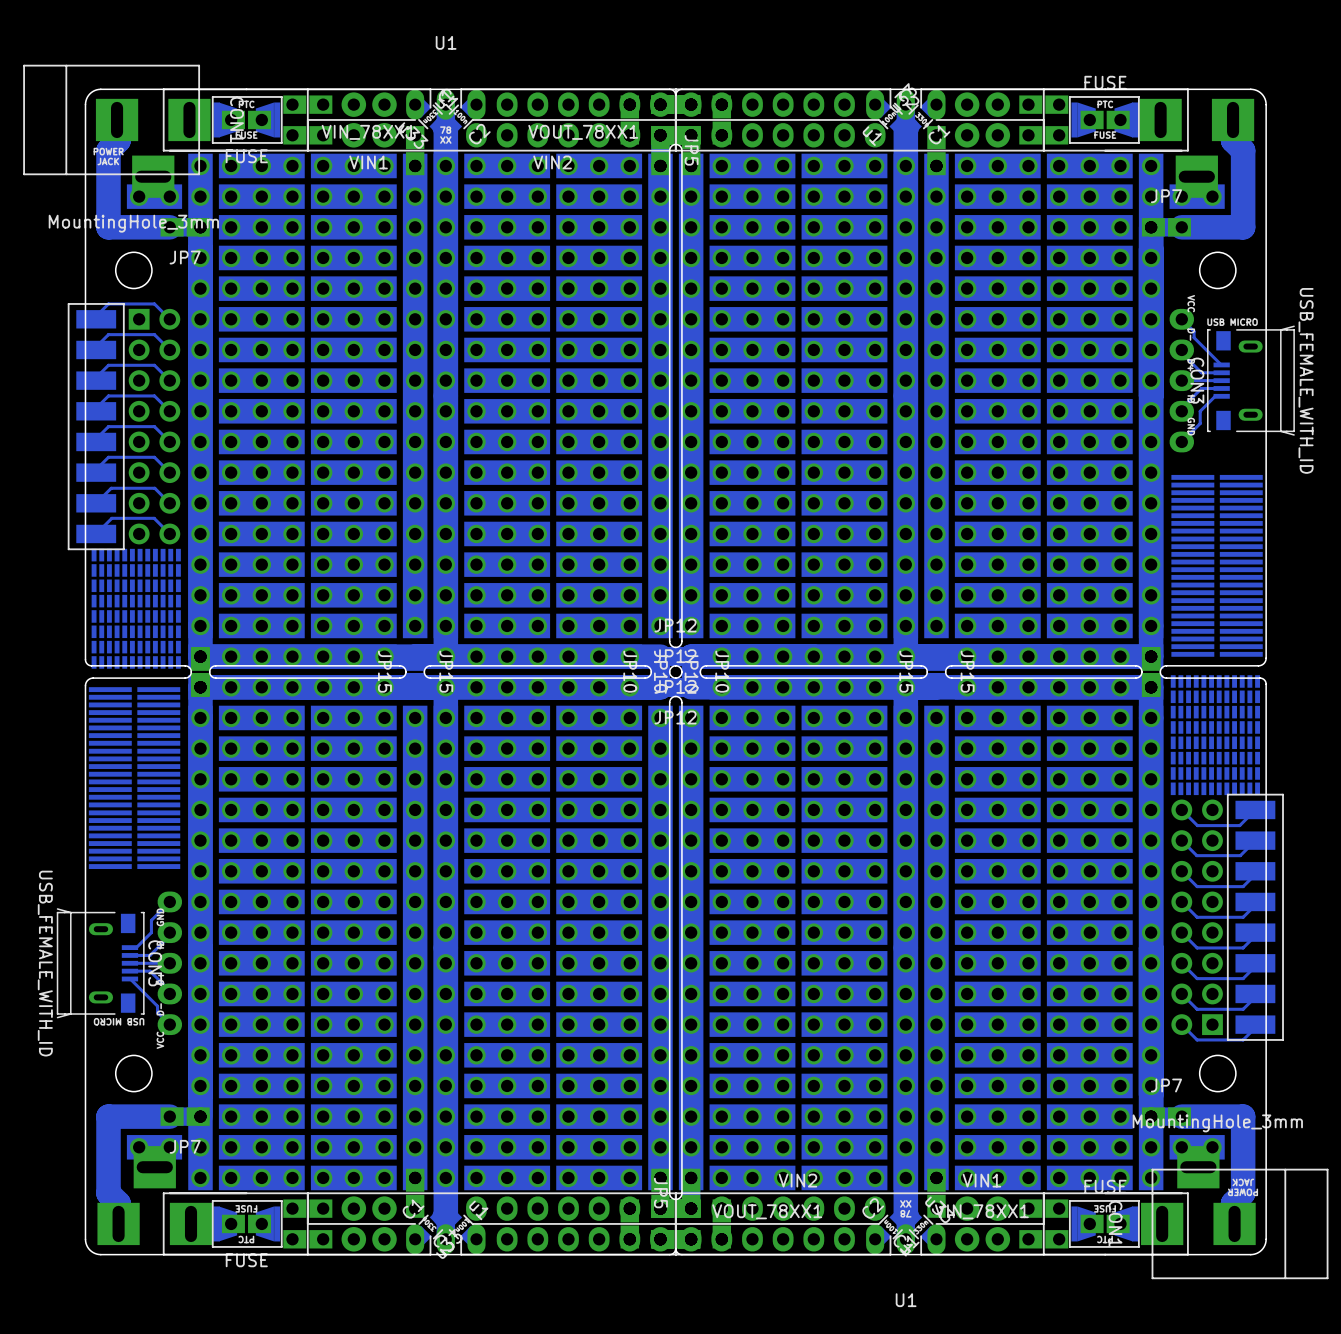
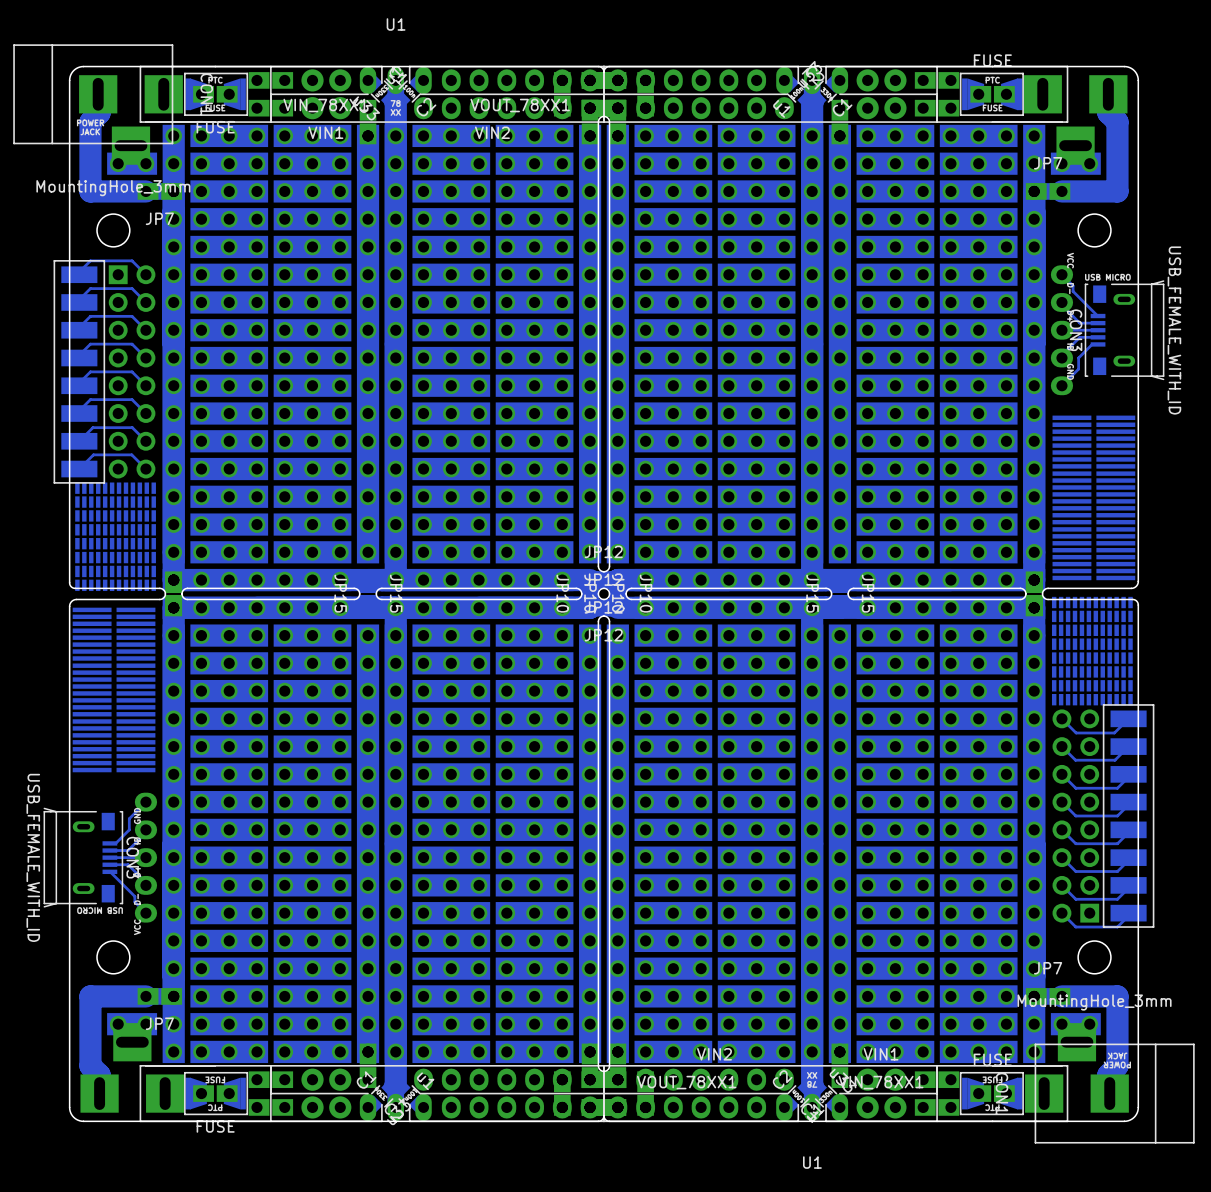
JP5 side: bottom (660, 150) -> top (590, 122)
JP5 side: bottom (691, 1193) -> top (617, 1065)

